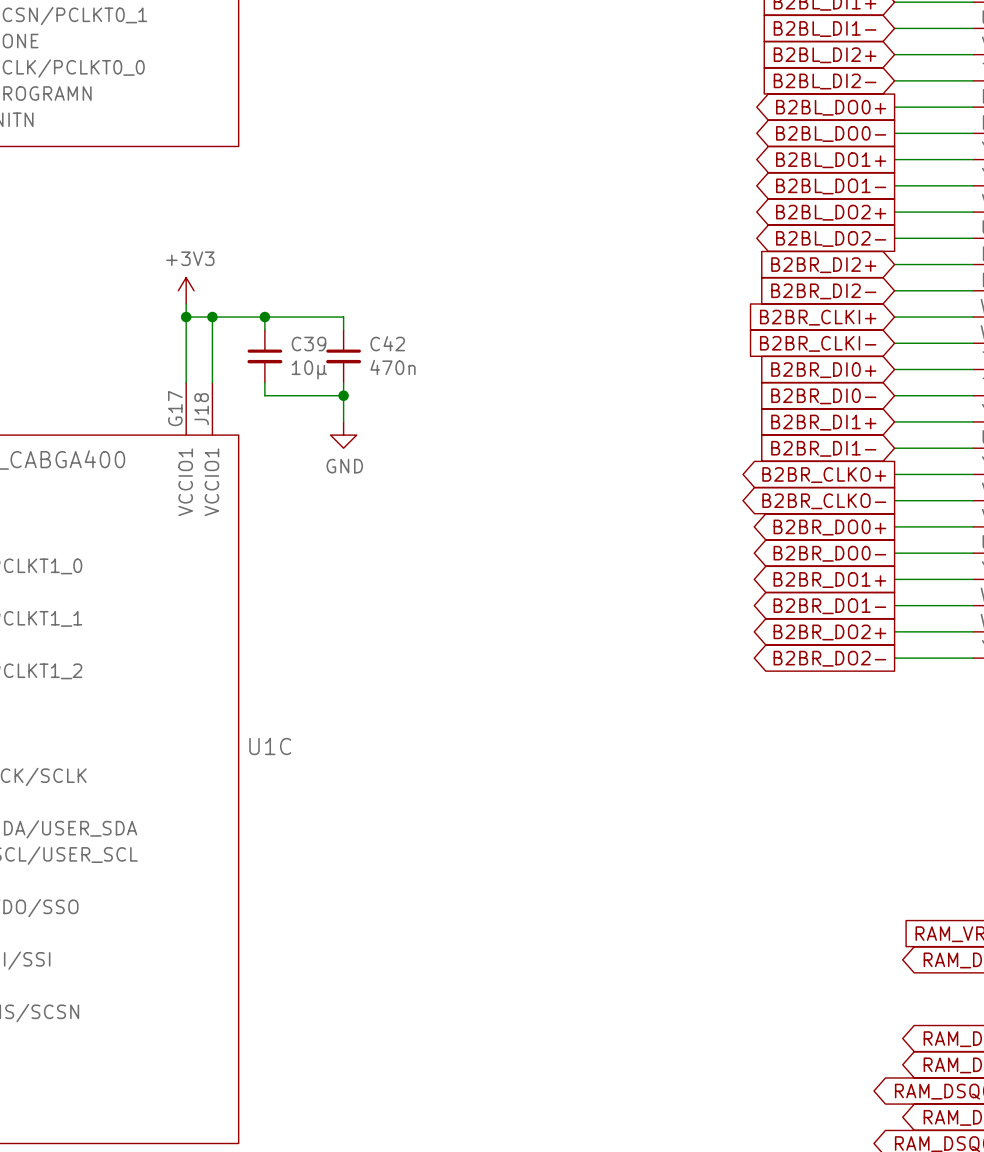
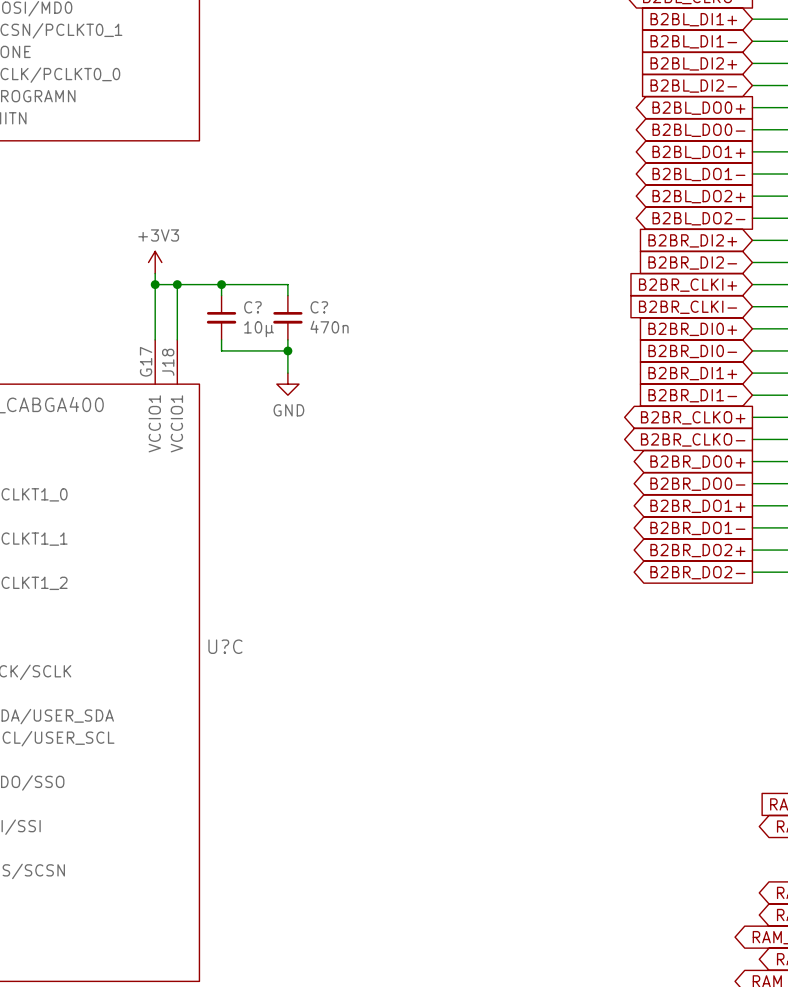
C42 name: C42 (387, 343) -> C? (319, 307)
C39 name: C39 (308, 344) -> C? (252, 307)
U1C name: U1C (270, 746) -> U?C (225, 646)

